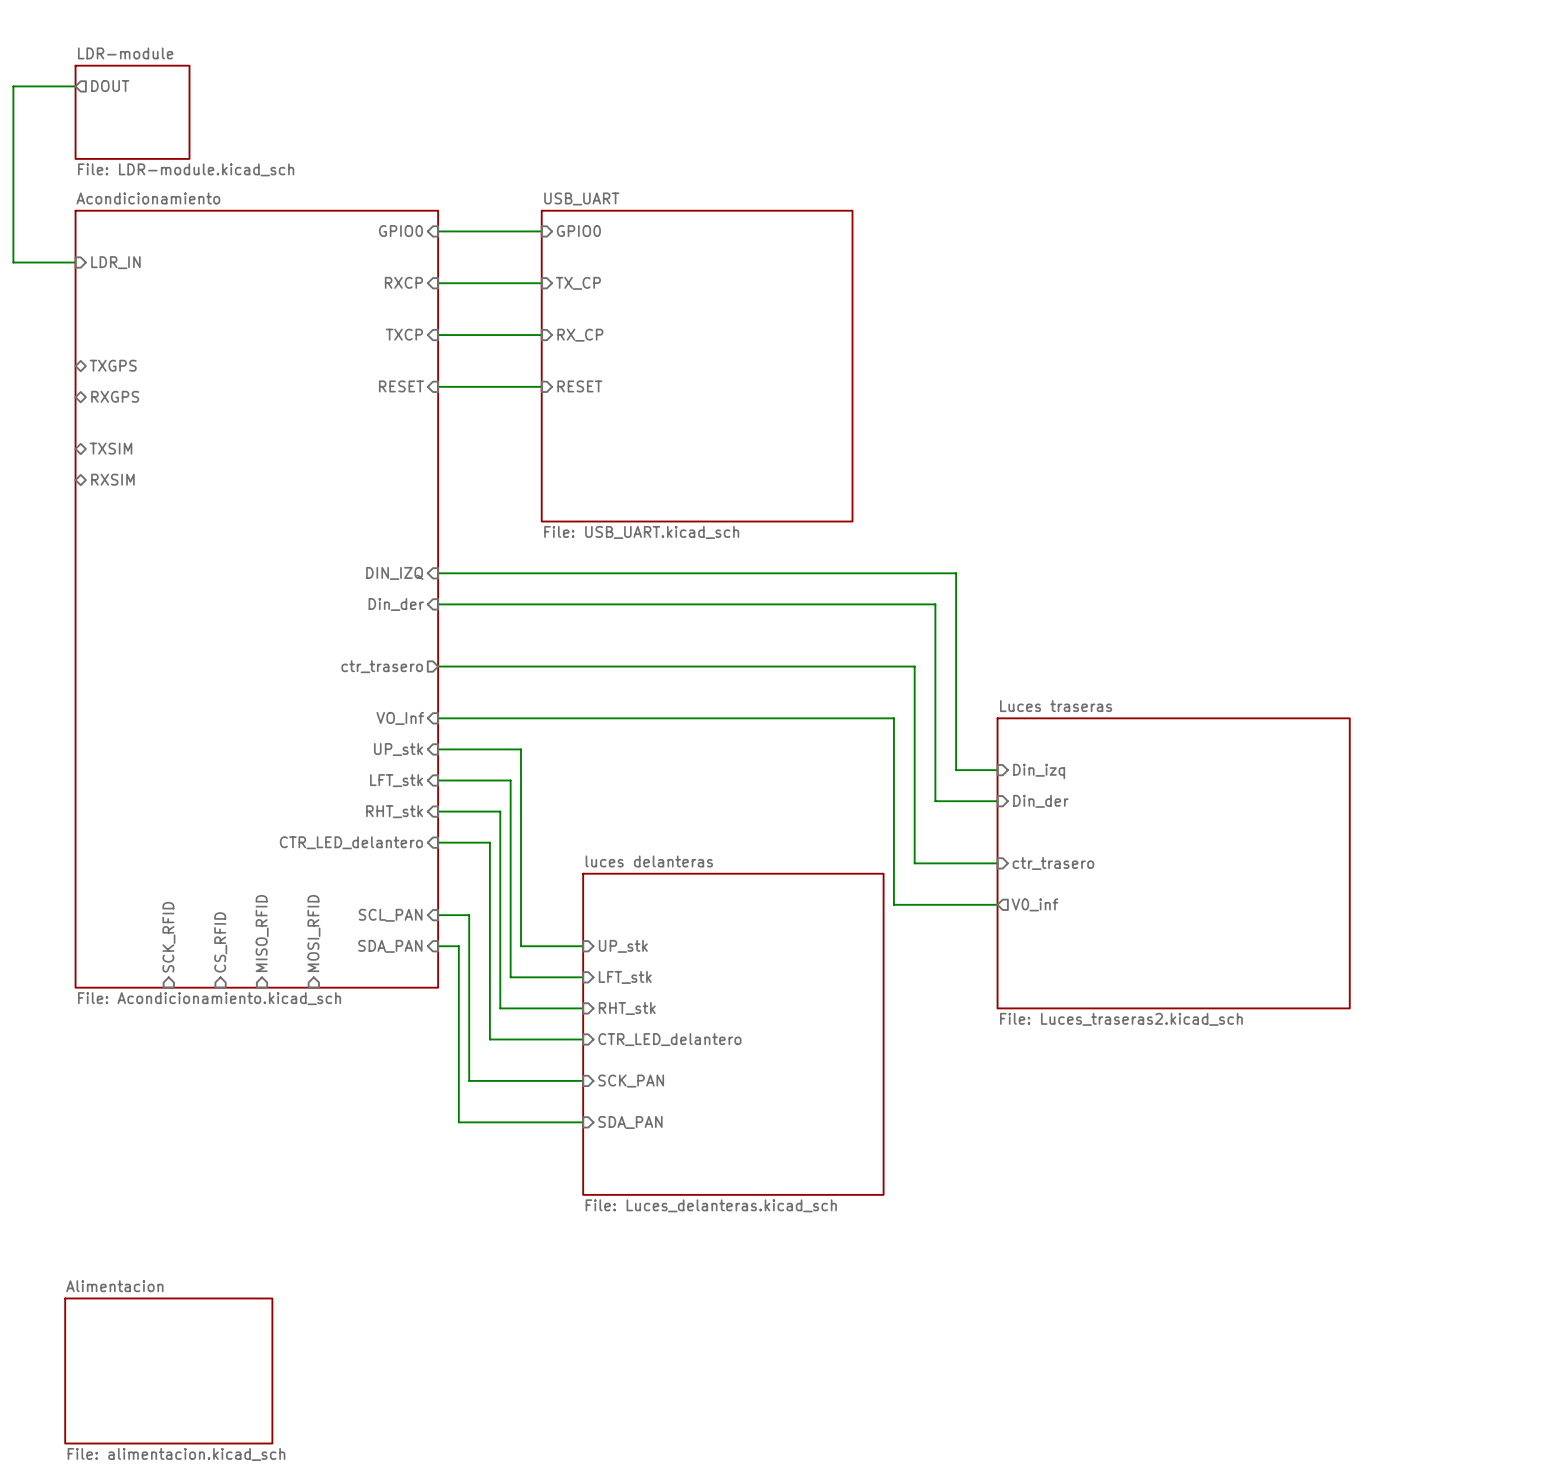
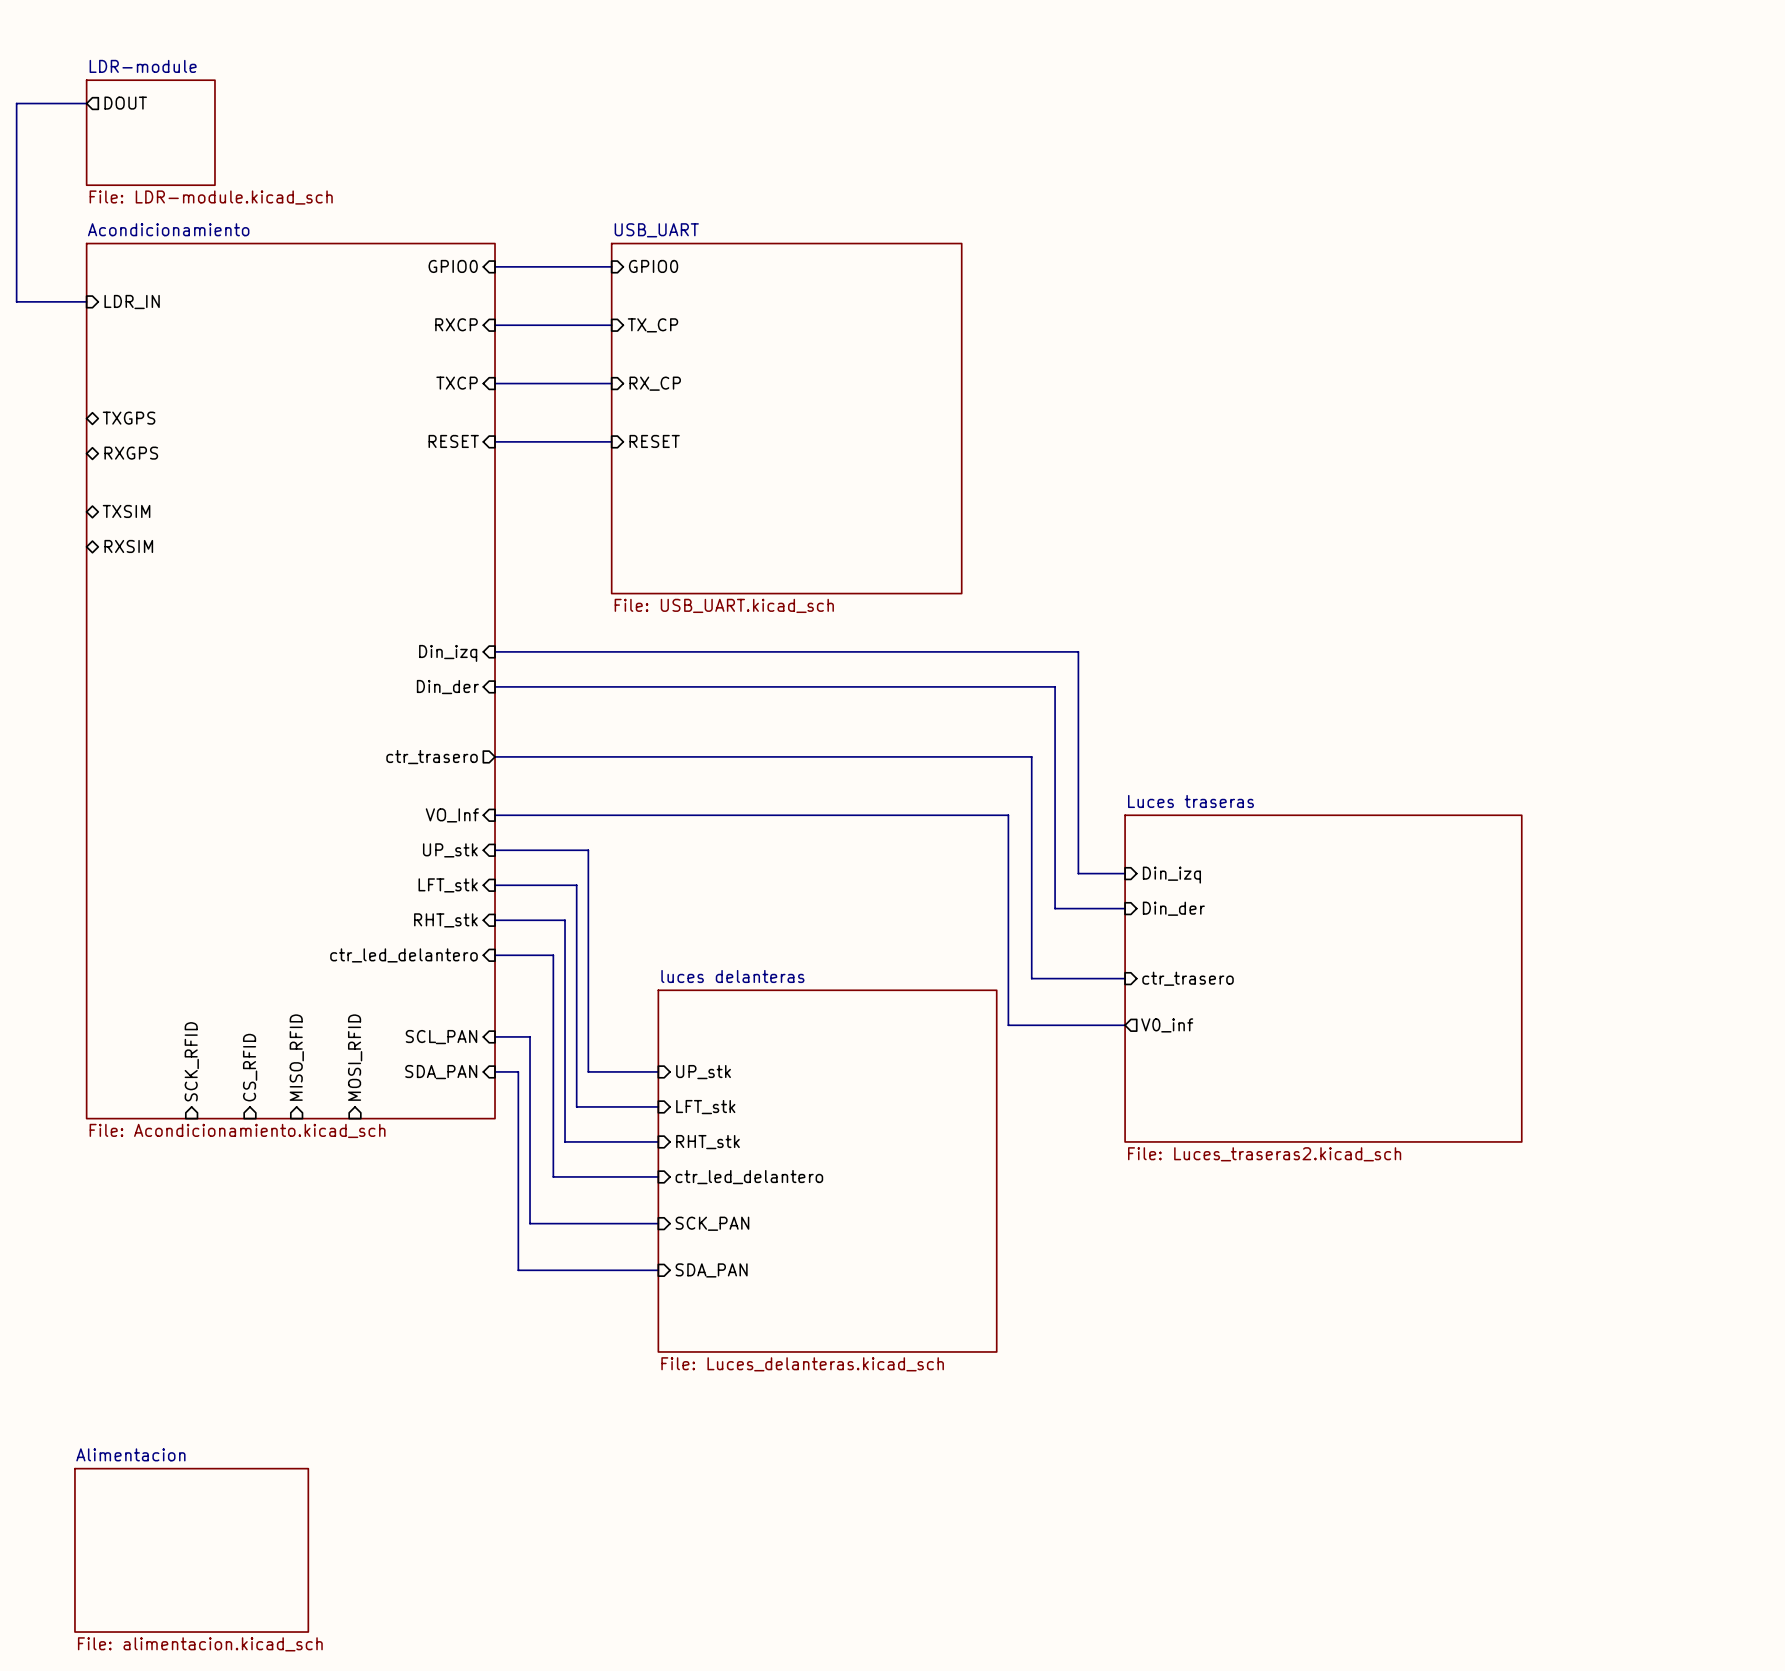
sheet pin: DIN_IZQ (394, 573) -> Din_izq (448, 653)
sheet pin: CTR_LED_delantero (351, 842) -> ctr_led_delantero (403, 955)
sheet pin: CTR_LED_delantero (669, 1039) -> ctr_led_delantero (749, 1177)

